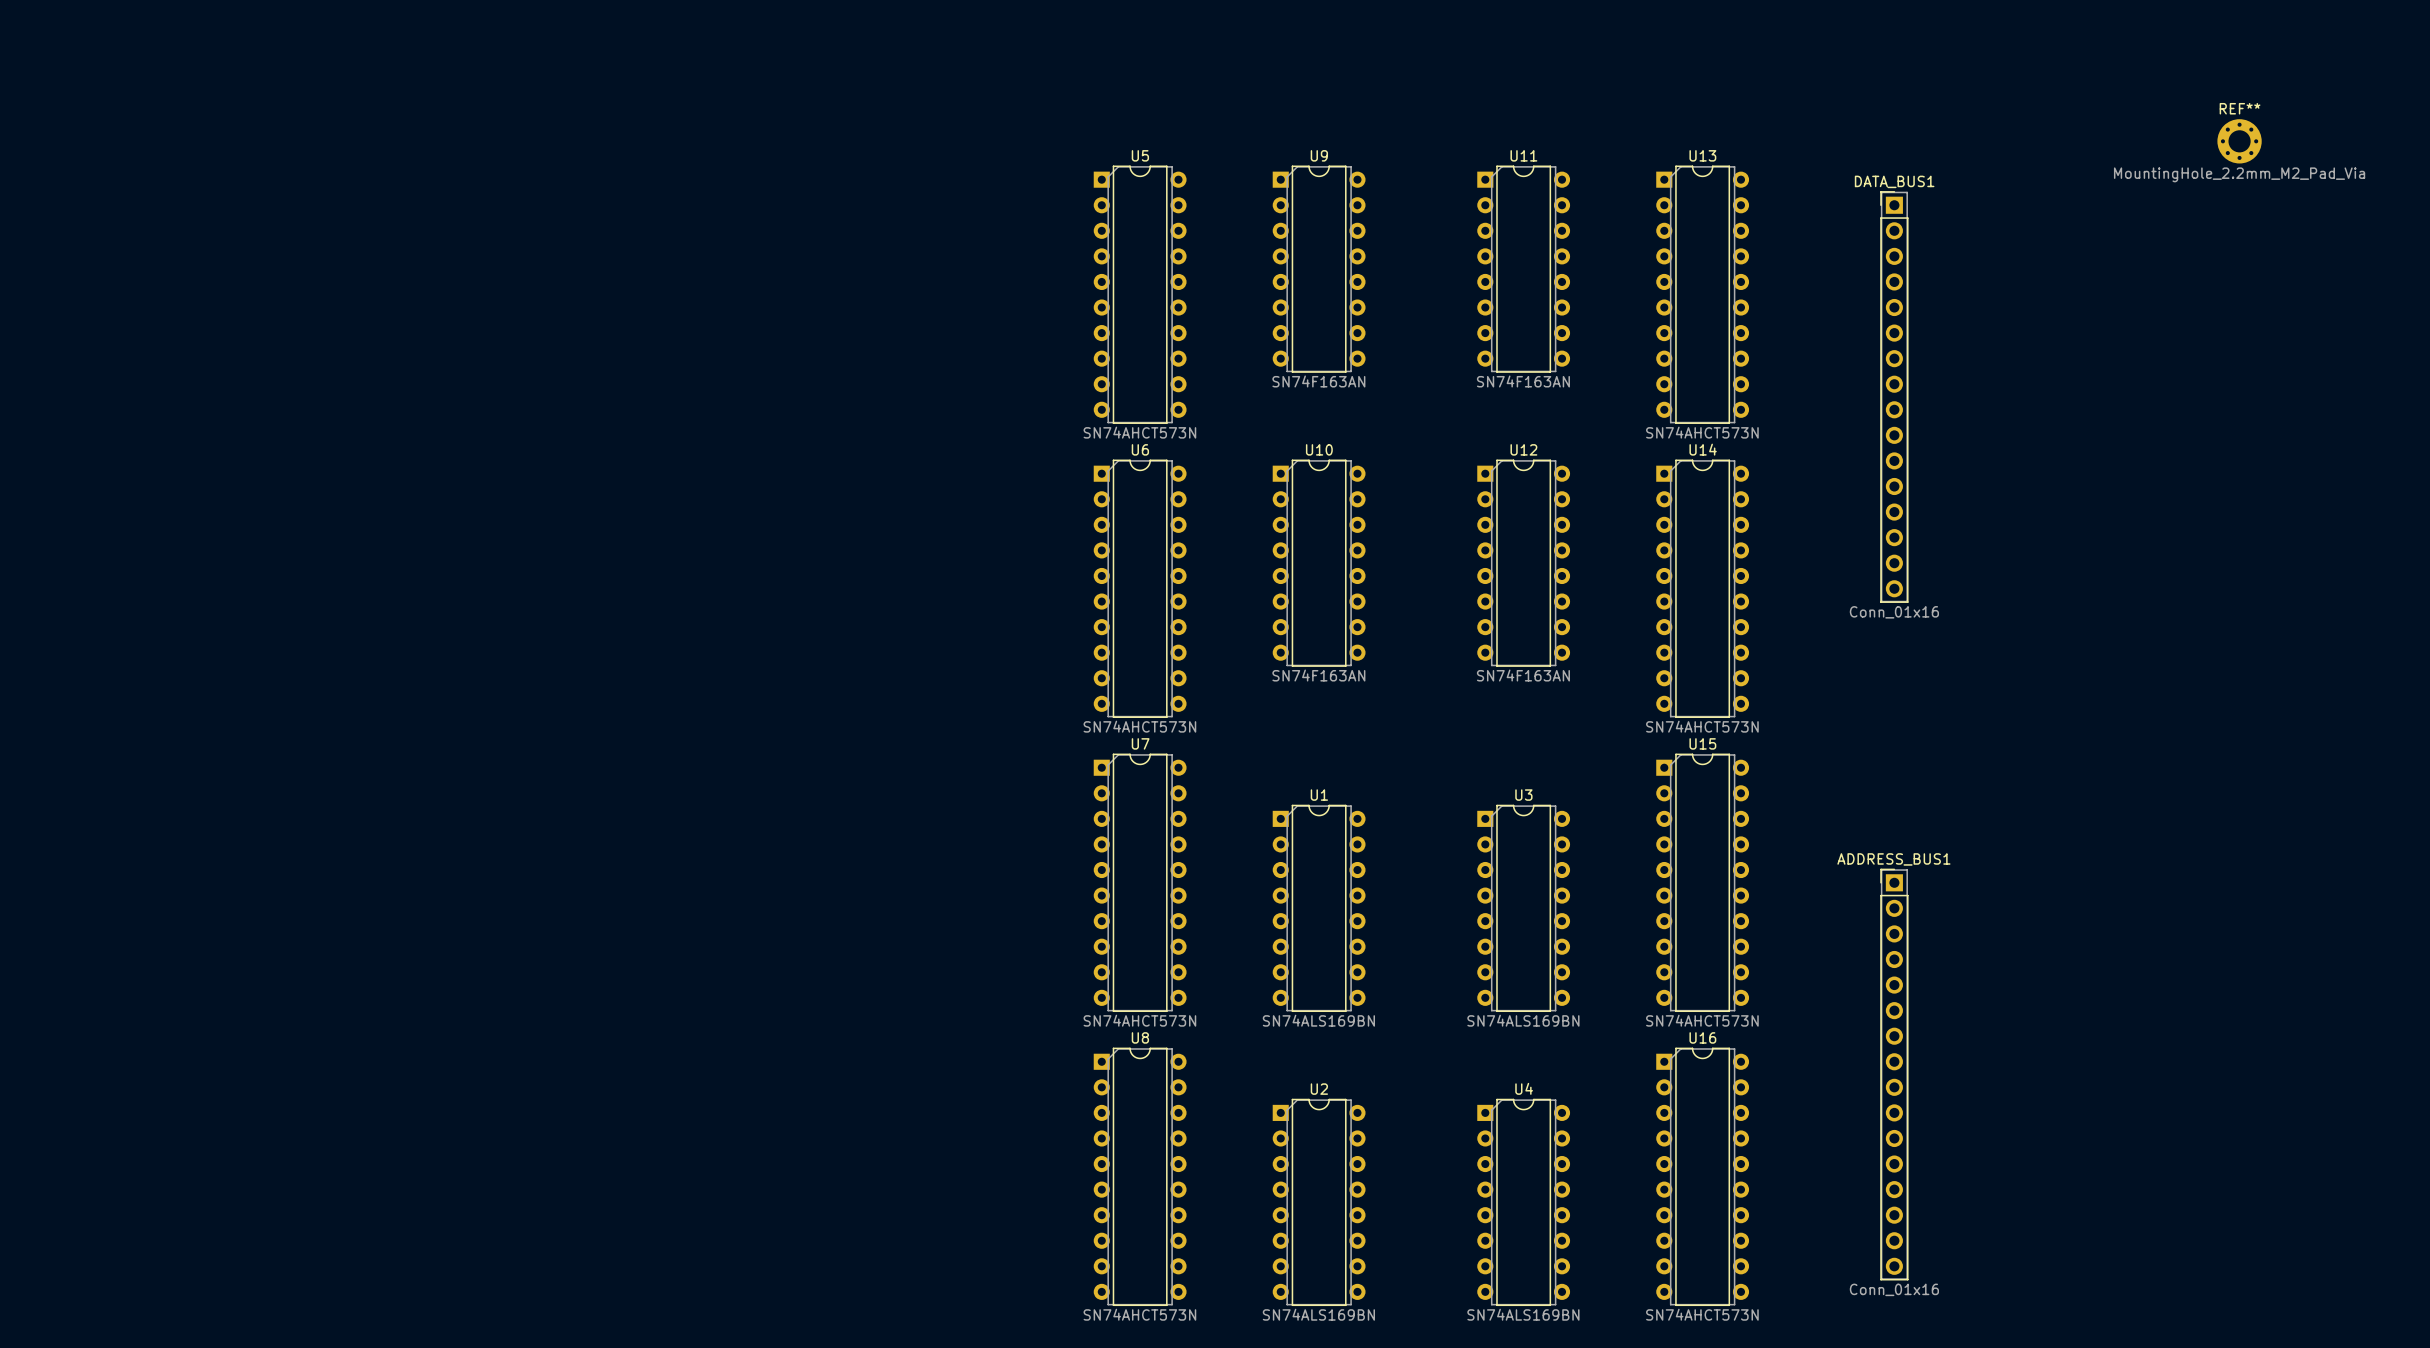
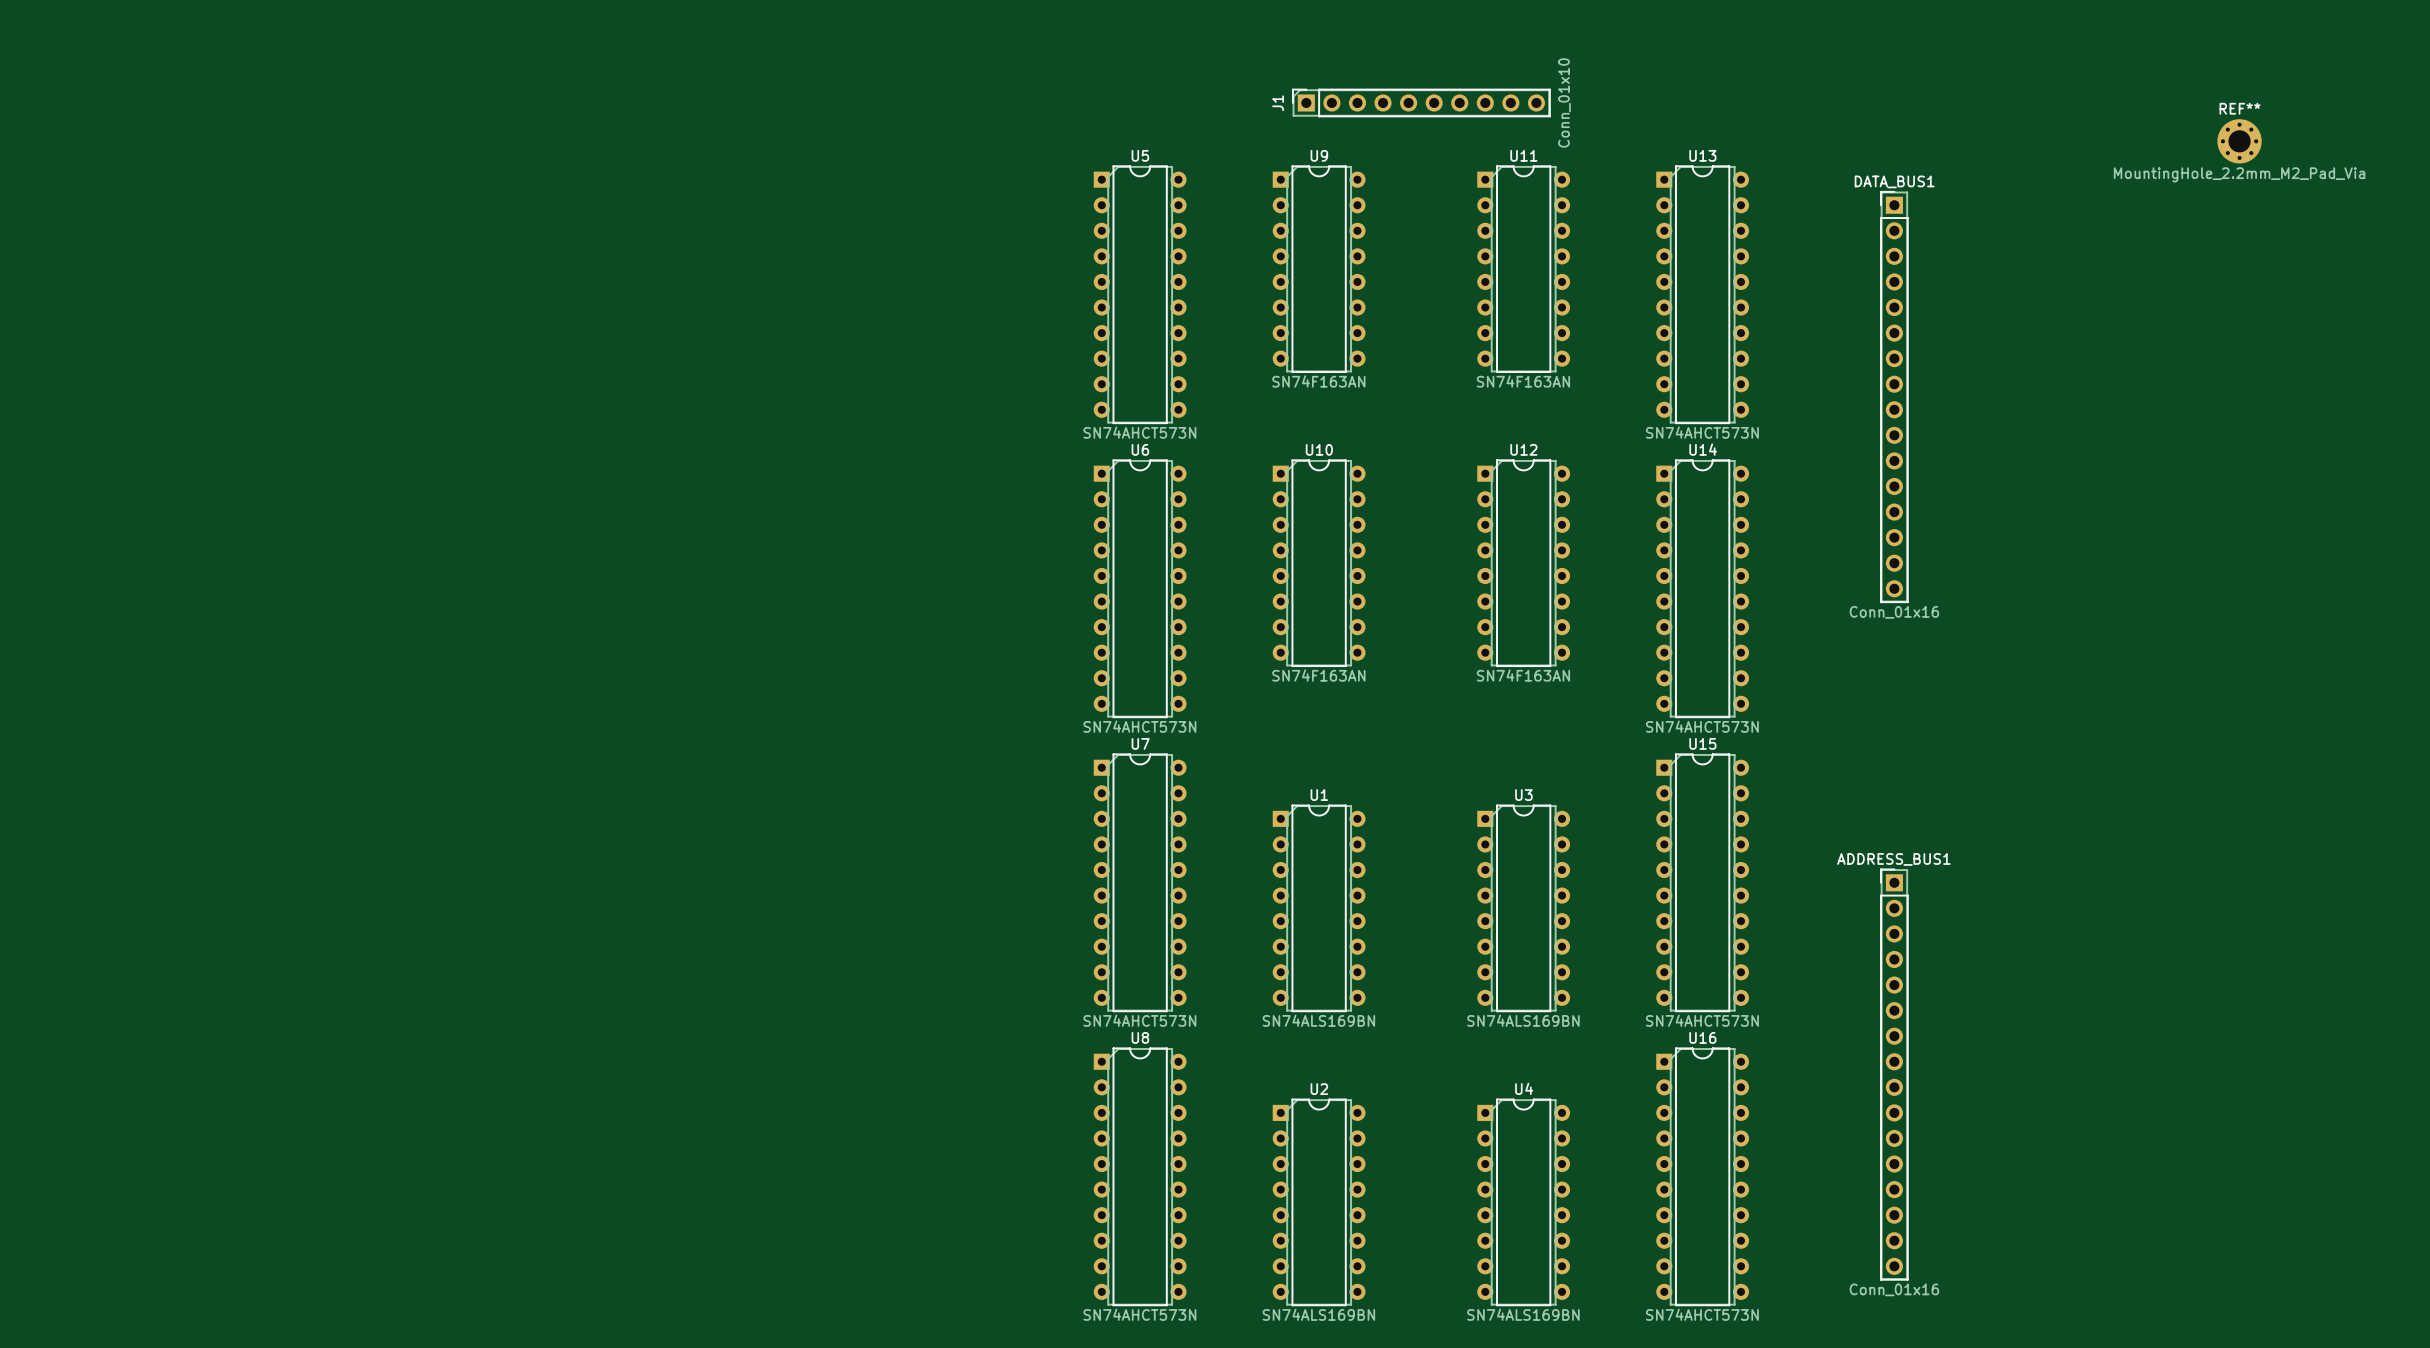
J1: none -> Conn_01x10 (1421, 102)

